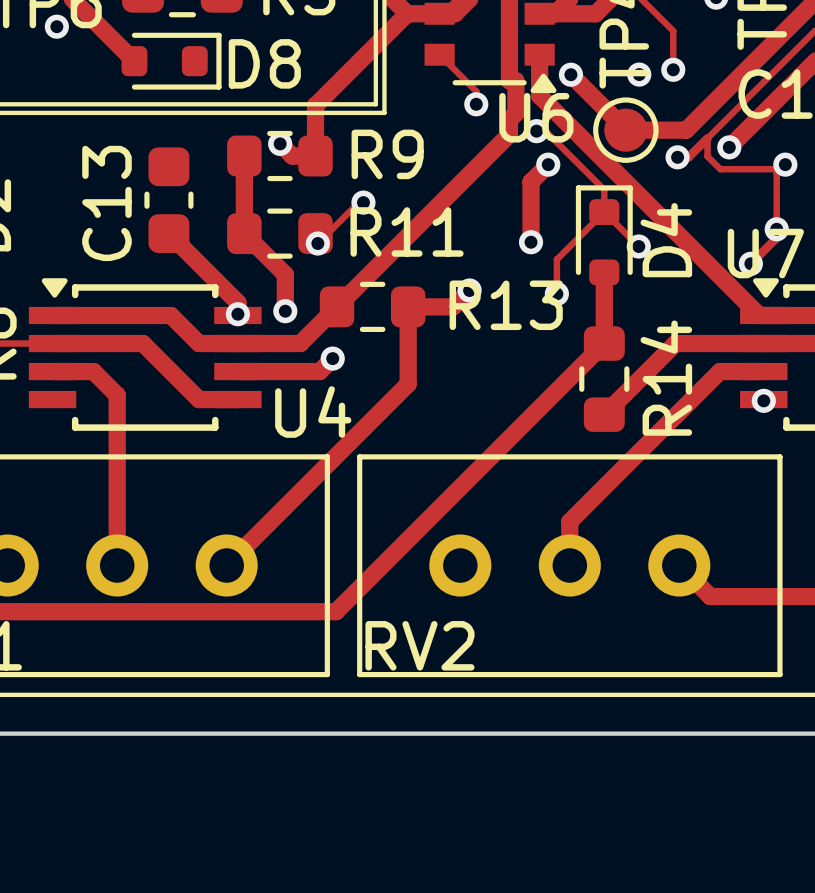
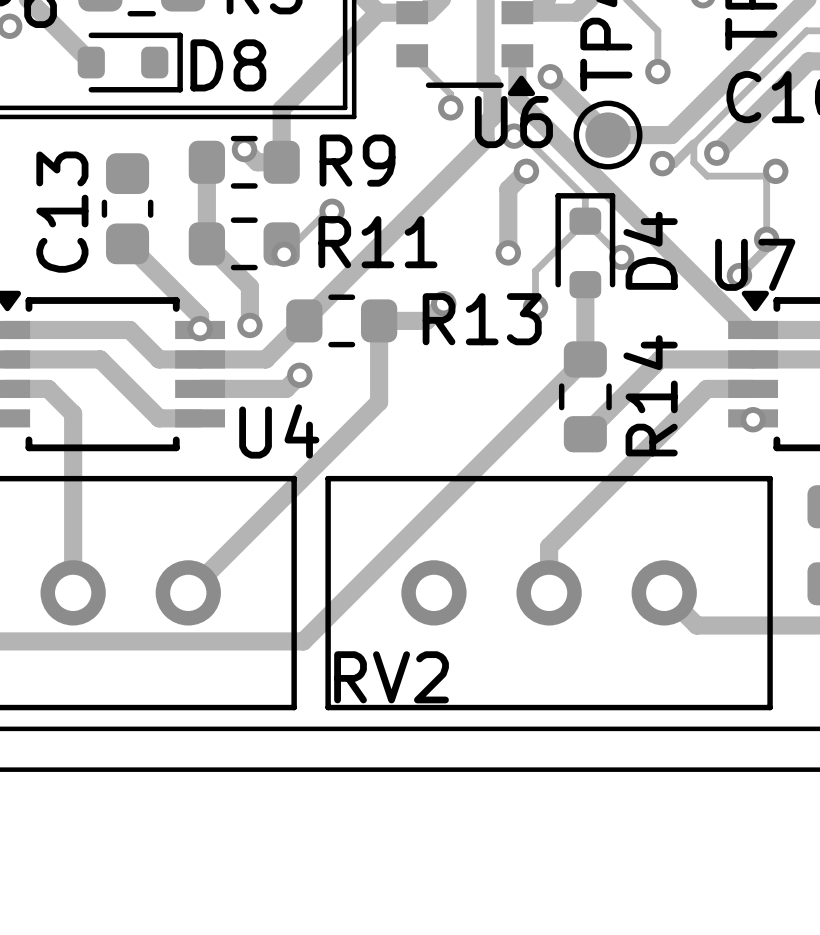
via: (639, 74) -> none

